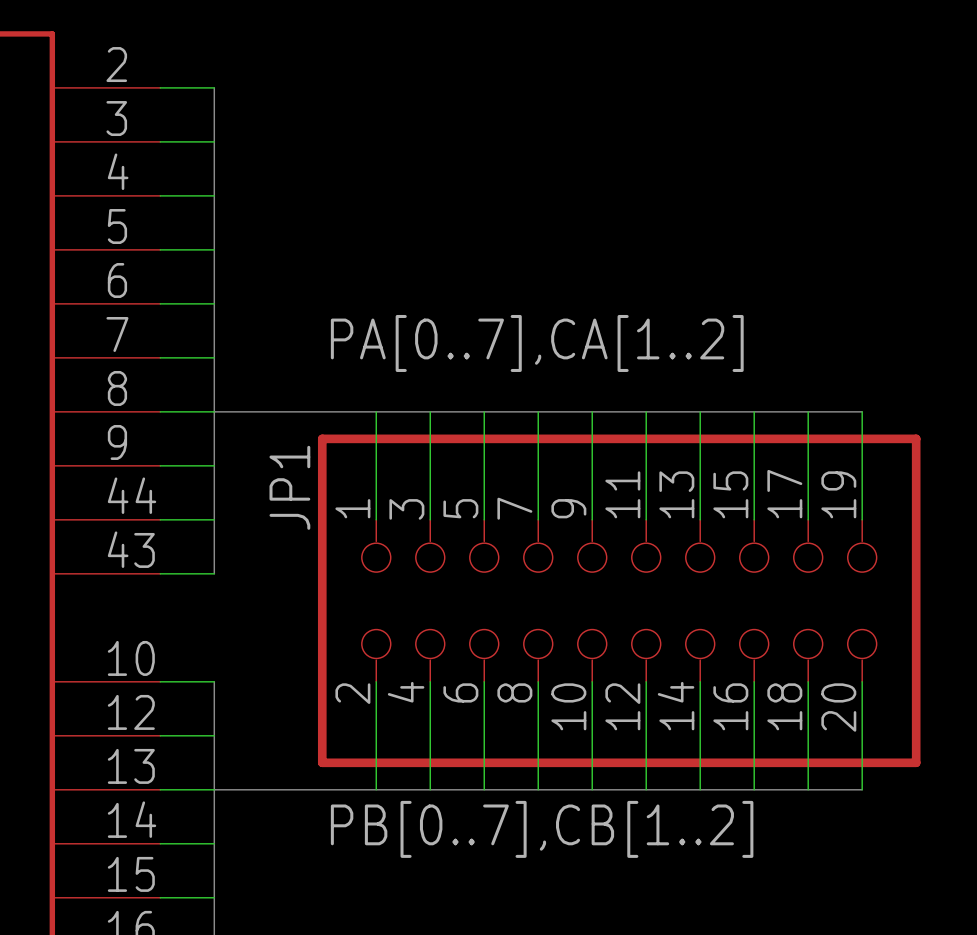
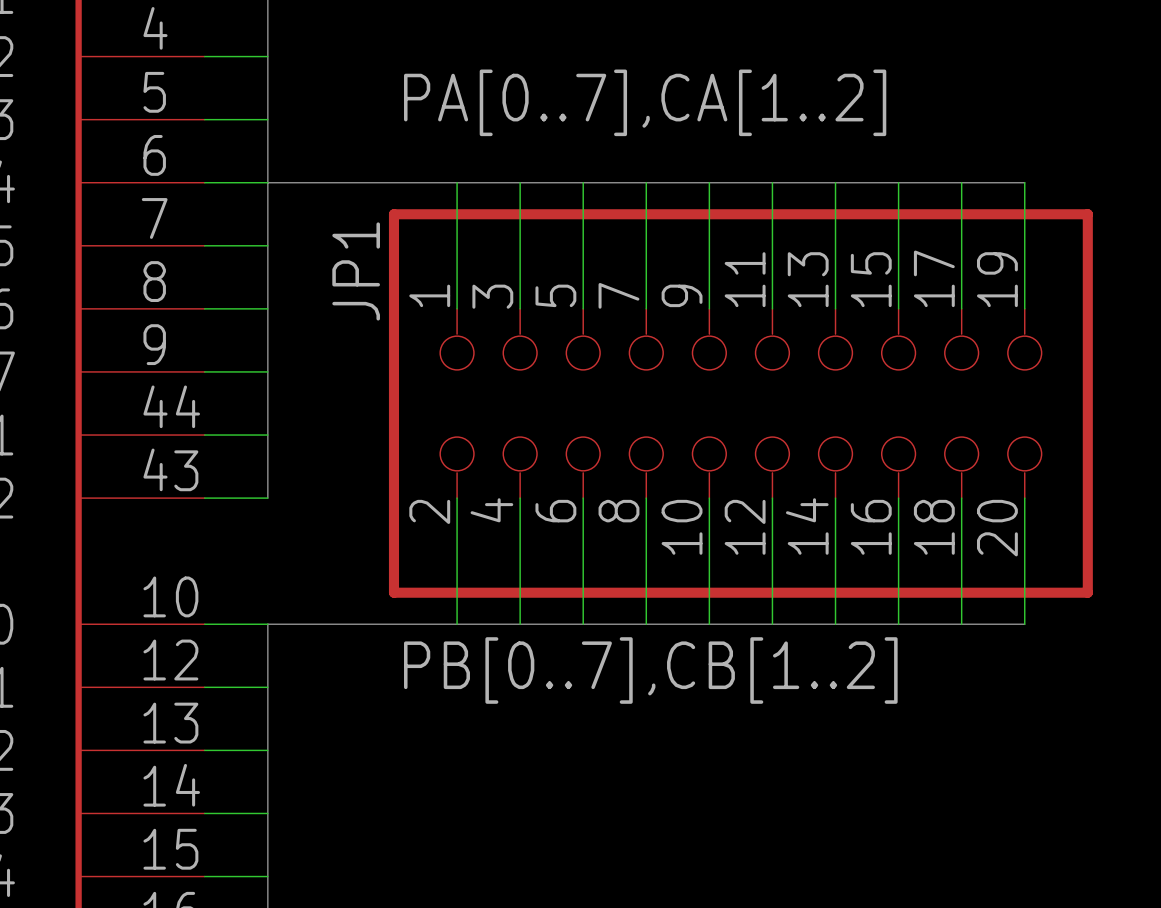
label position: PA[0..7],CA[1..2] (537, 343) -> PA[0..7],CA[1..2] (645, 102)
bus: (214, 411) (862, 411) -> (267, 182) (1024, 182)
wire: (376, 411) (376, 519) -> (457, 308) (457, 182)
wire: (430, 411) (430, 519) -> (520, 308) (520, 182)
wire: (484, 411) (484, 519) -> (583, 308) (583, 182)
wire: (538, 411) (538, 519) -> (646, 308) (646, 182)
wire: (592, 411) (592, 519) -> (709, 308) (709, 182)
wire: (646, 411) (646, 519) -> (772, 308) (772, 182)
wire: (700, 411) (700, 519) -> (835, 308) (835, 182)
wire: (754, 411) (754, 519) -> (898, 308) (898, 182)
wire: (808, 411) (808, 519) -> (961, 308) (961, 182)
wire: (862, 411) (862, 519) -> (1024, 308) (1024, 182)
JP1 position: (619, 600) -> (740, 403)
wire: (376, 681) (376, 789) -> (457, 624) (457, 498)
wire: (430, 681) (430, 789) -> (520, 624) (520, 498)
wire: (484, 681) (484, 789) -> (583, 624) (583, 498)
wire: (538, 681) (538, 789) -> (646, 624) (646, 498)
wire: (592, 681) (592, 789) -> (709, 624) (709, 498)
wire: (646, 681) (646, 789) -> (772, 624) (772, 498)
wire: (700, 681) (700, 789) -> (835, 624) (835, 498)
wire: (754, 681) (754, 789) -> (898, 624) (898, 498)
wire: (808, 681) (808, 789) -> (961, 624) (961, 498)
wire: (862, 681) (862, 789) -> (1024, 624) (1024, 498)
bus: (214, 789) (862, 789) -> (267, 624) (1024, 624)
label position: PB[0..7],CB[1..2] (542, 829) -> PB[0..7],CB[1..2] (650, 670)

